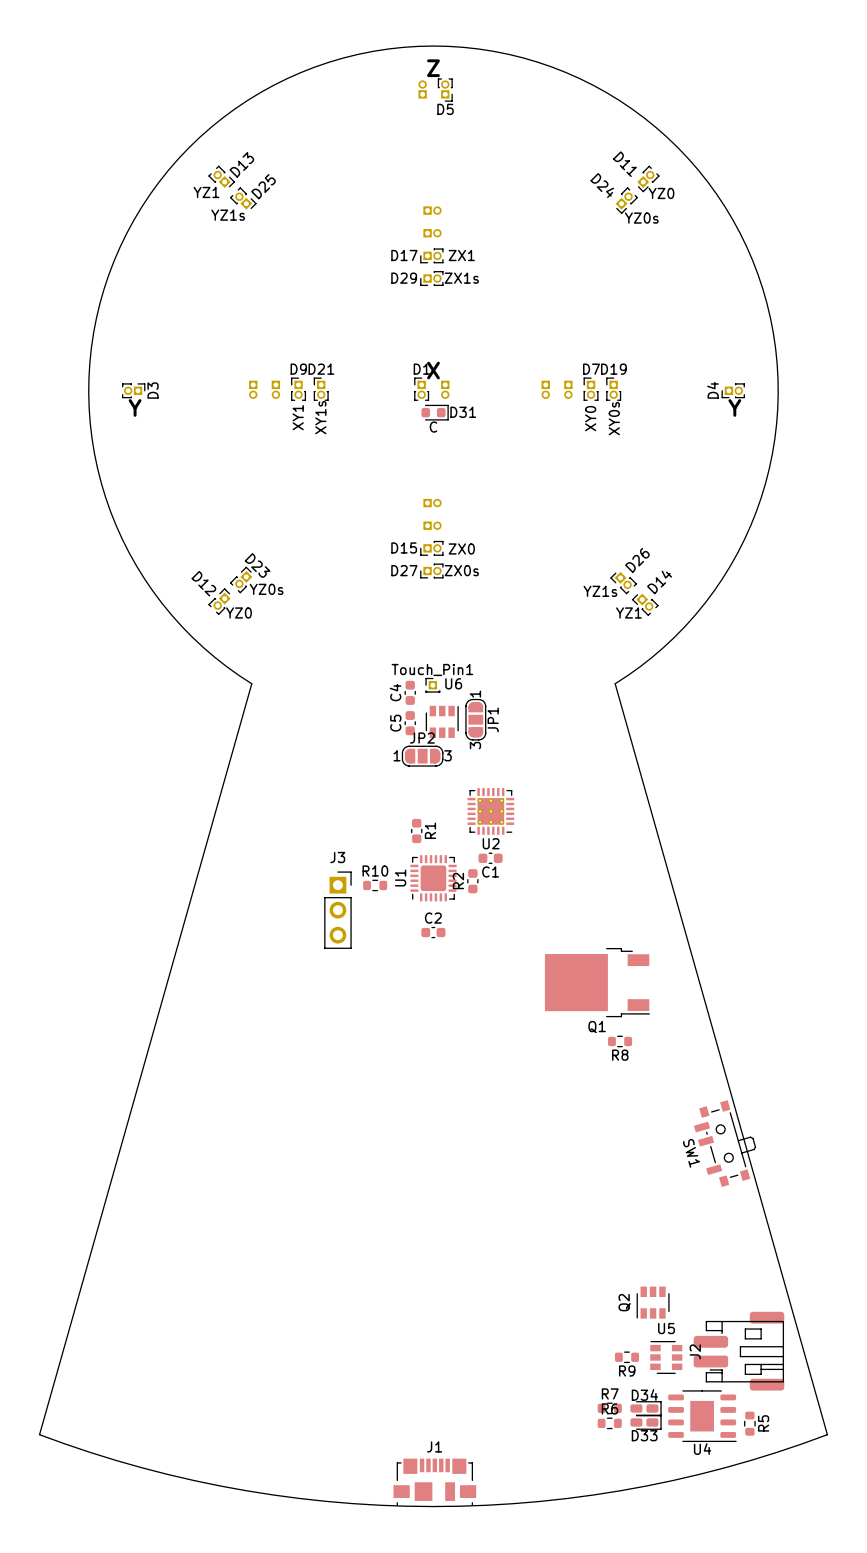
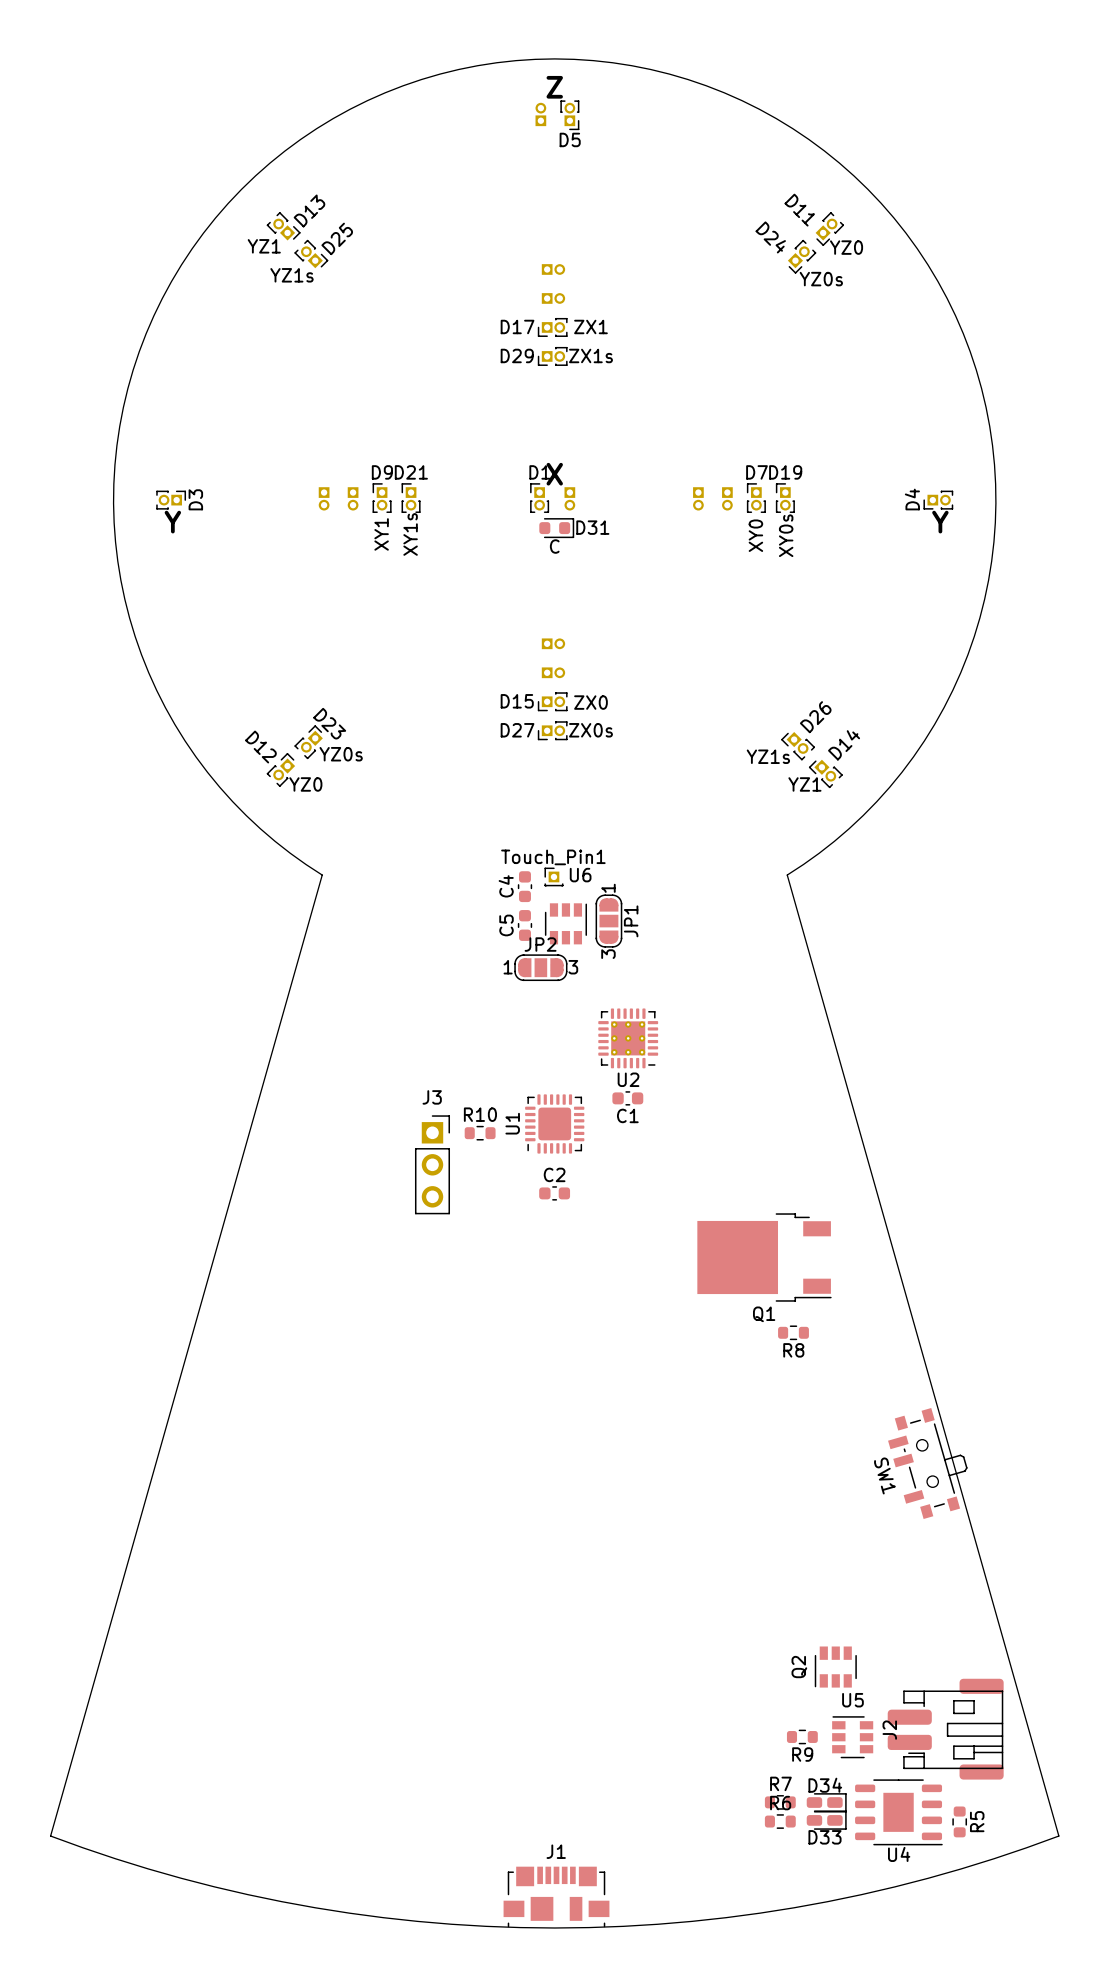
R1: (416, 831) -> none
R2: (472, 881) -> none

